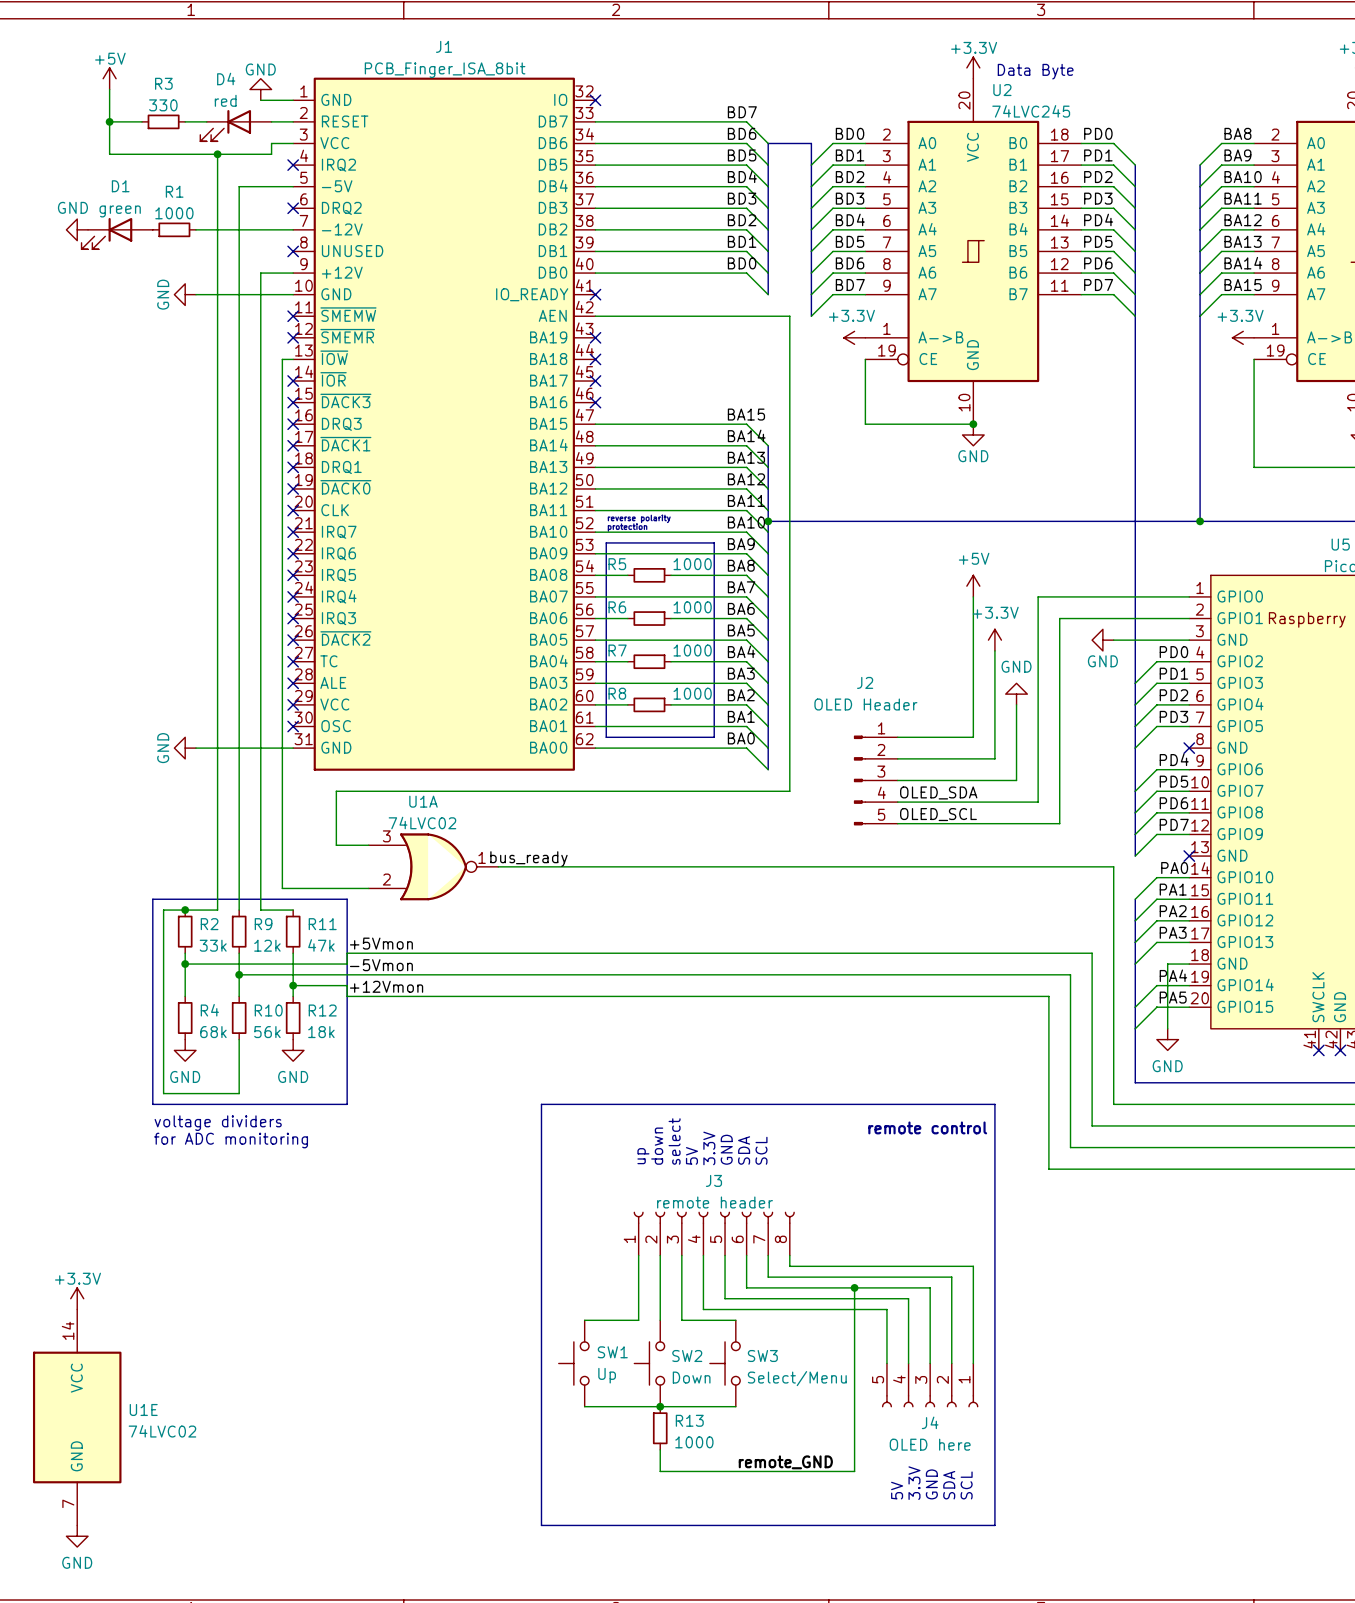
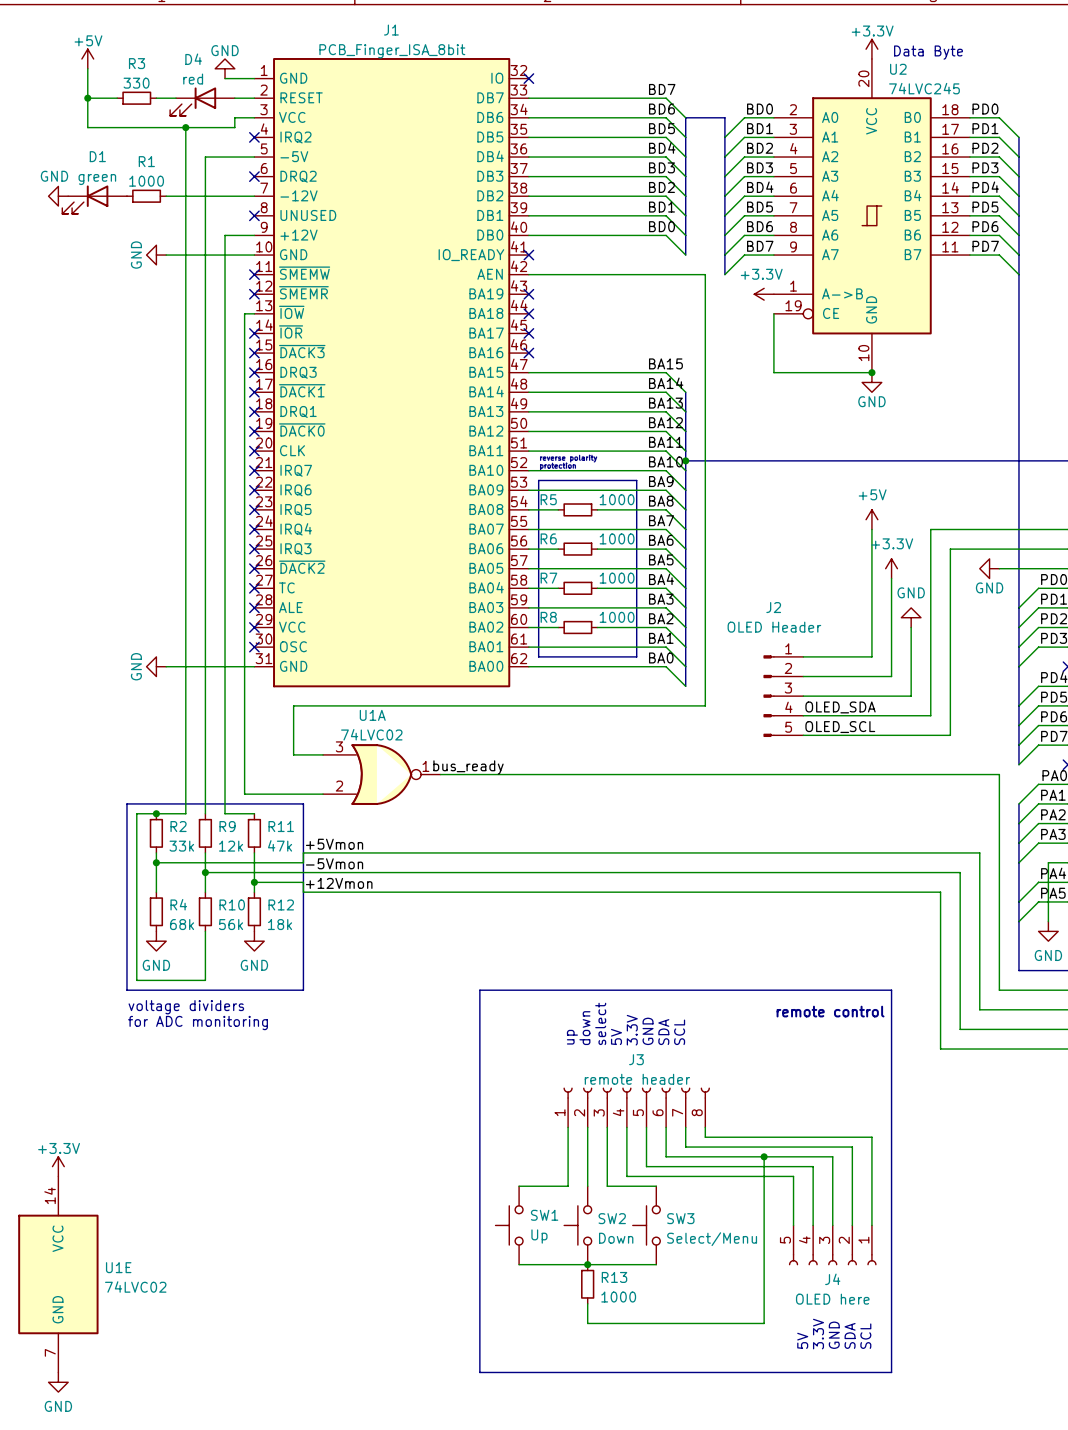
label: remote_GND (785, 1462) -> none

